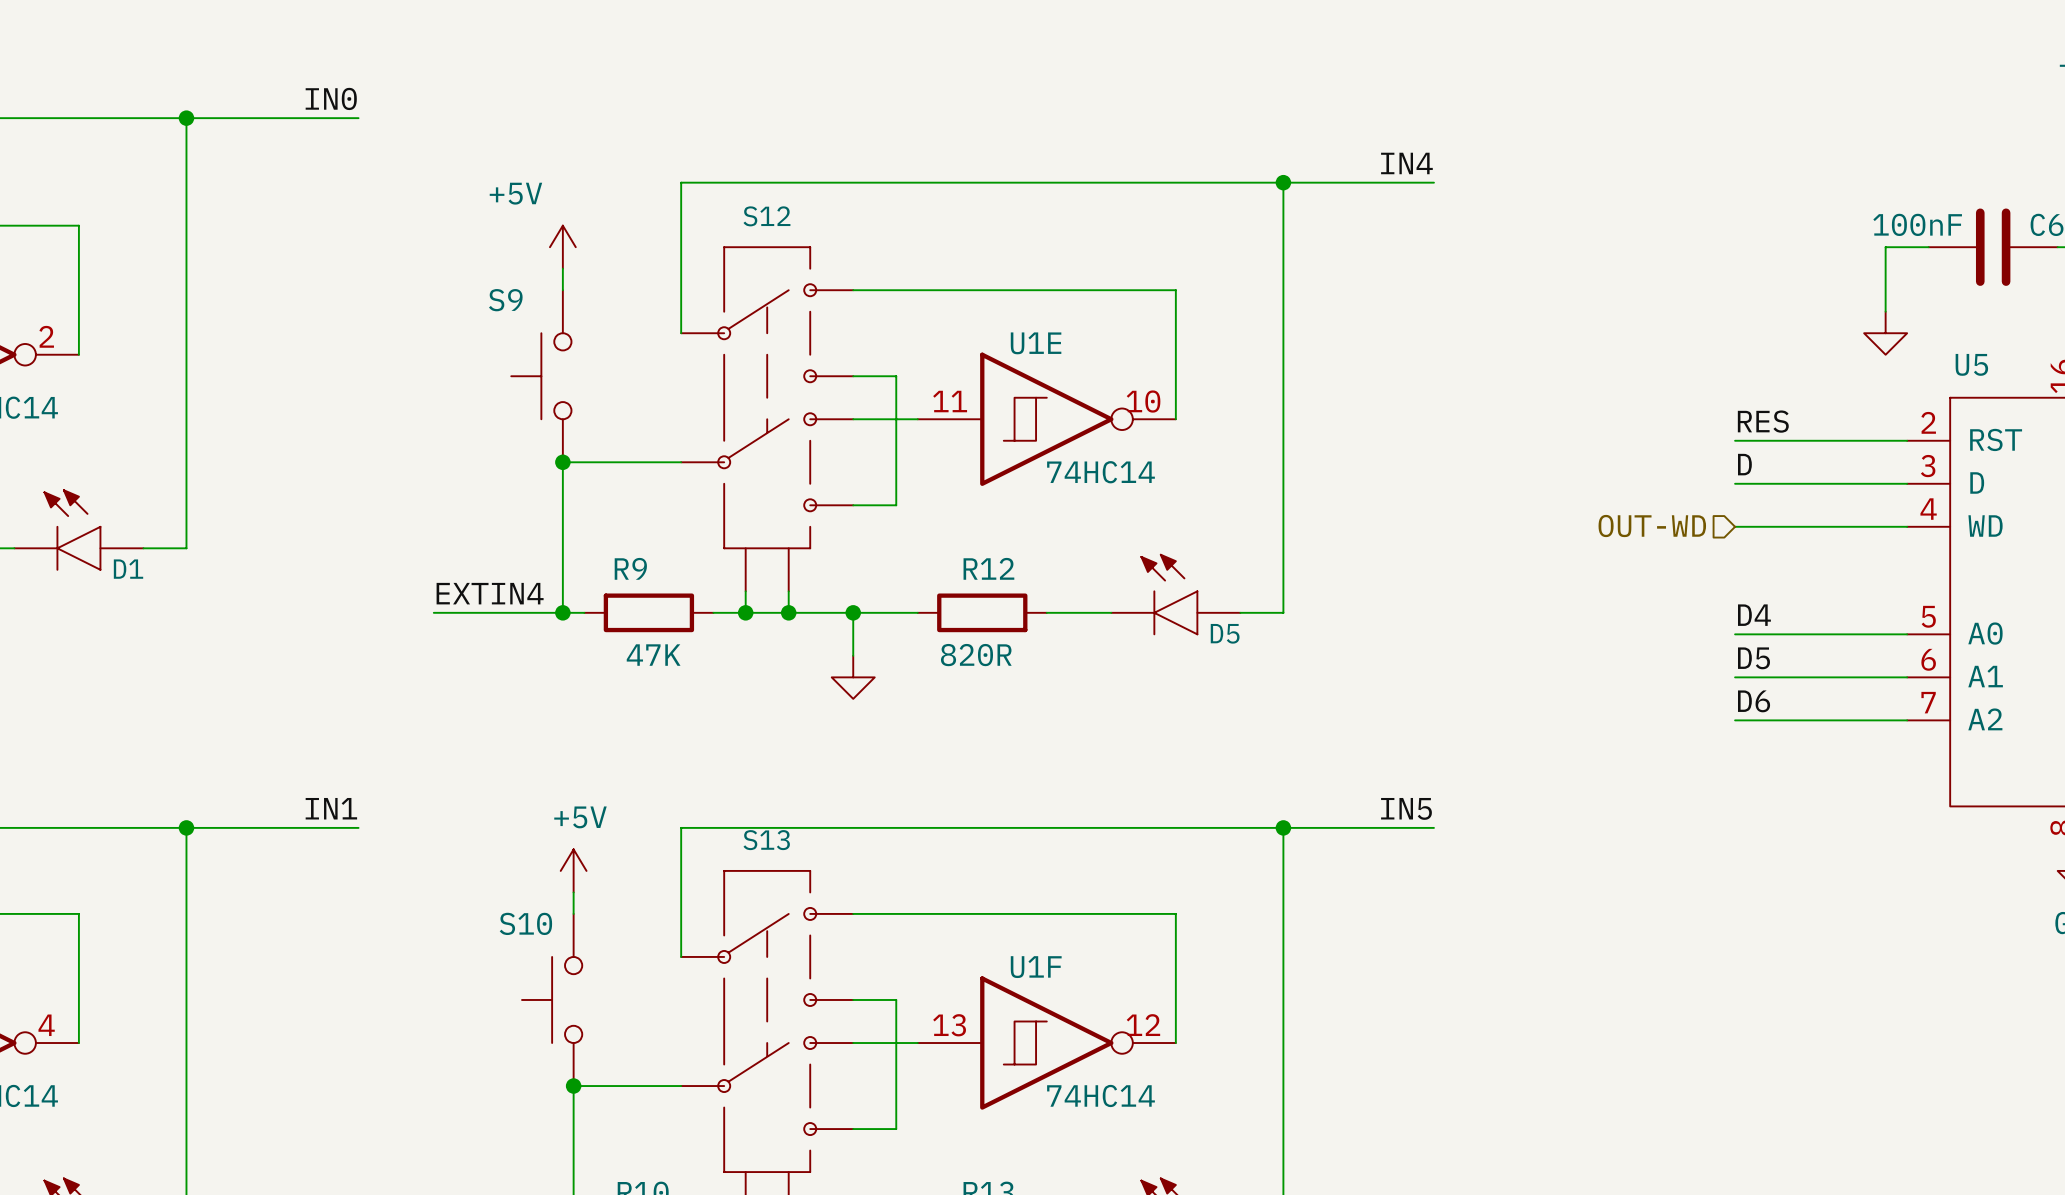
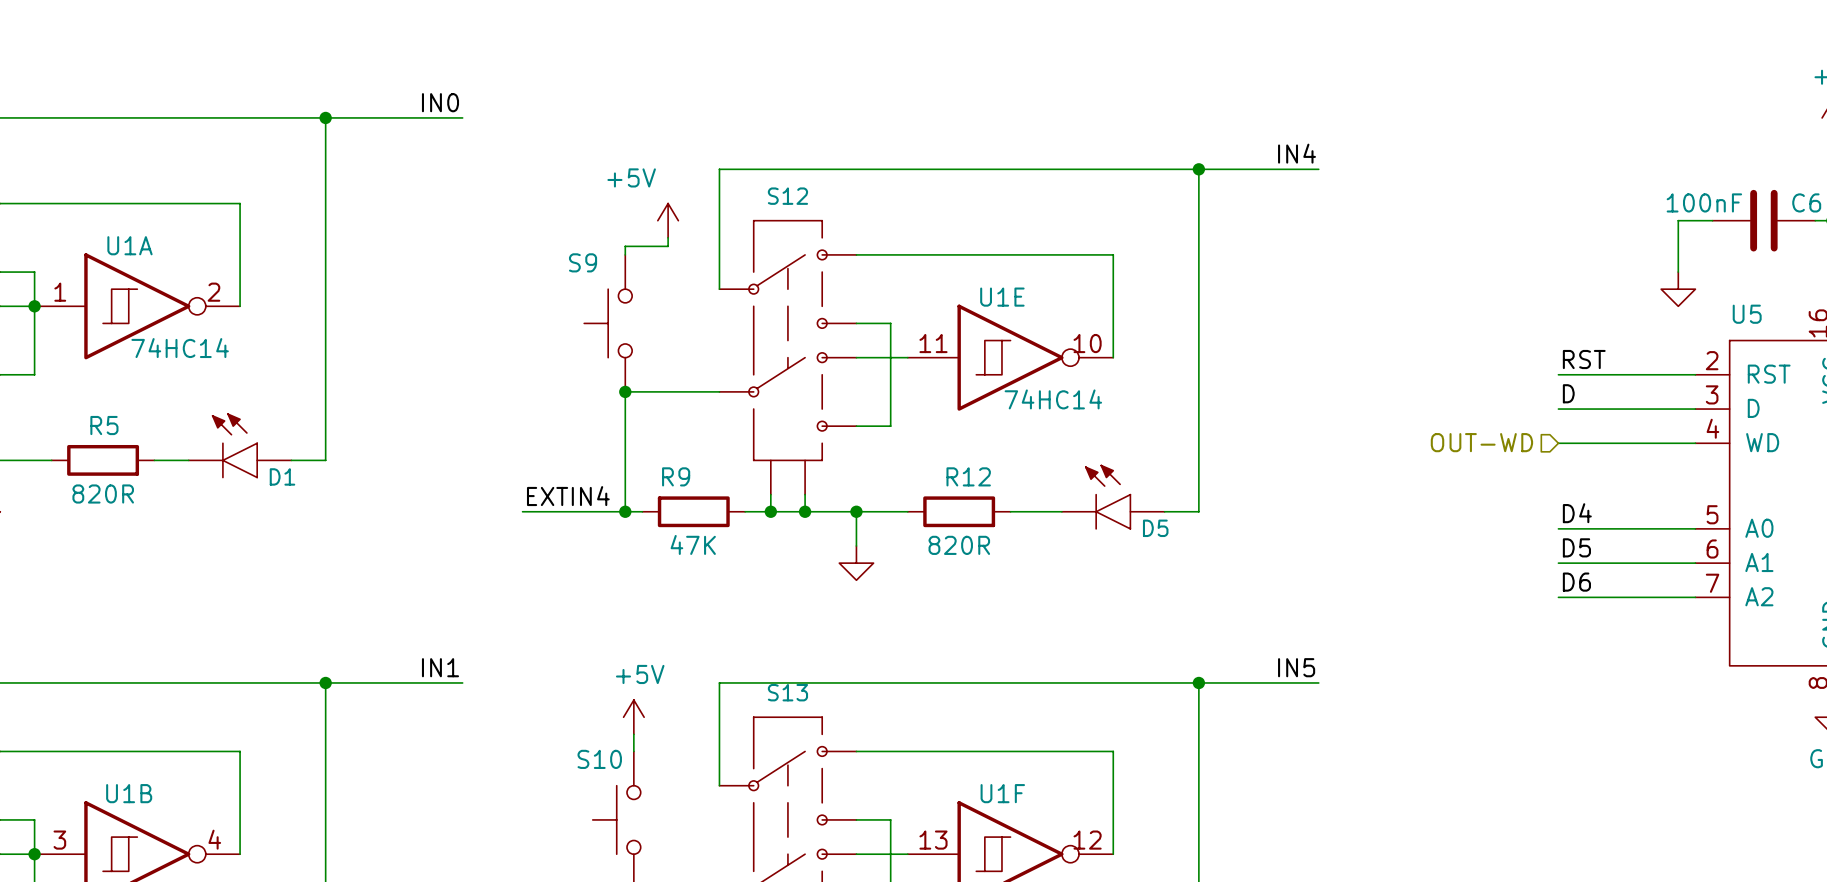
power symbol position: +5V (562, 247) -> +5V (668, 220)
wire: (562, 268) (562, 279) -> (668, 237) (668, 246) (625, 246)
label: RES (1763, 421) -> RST (1584, 359)

